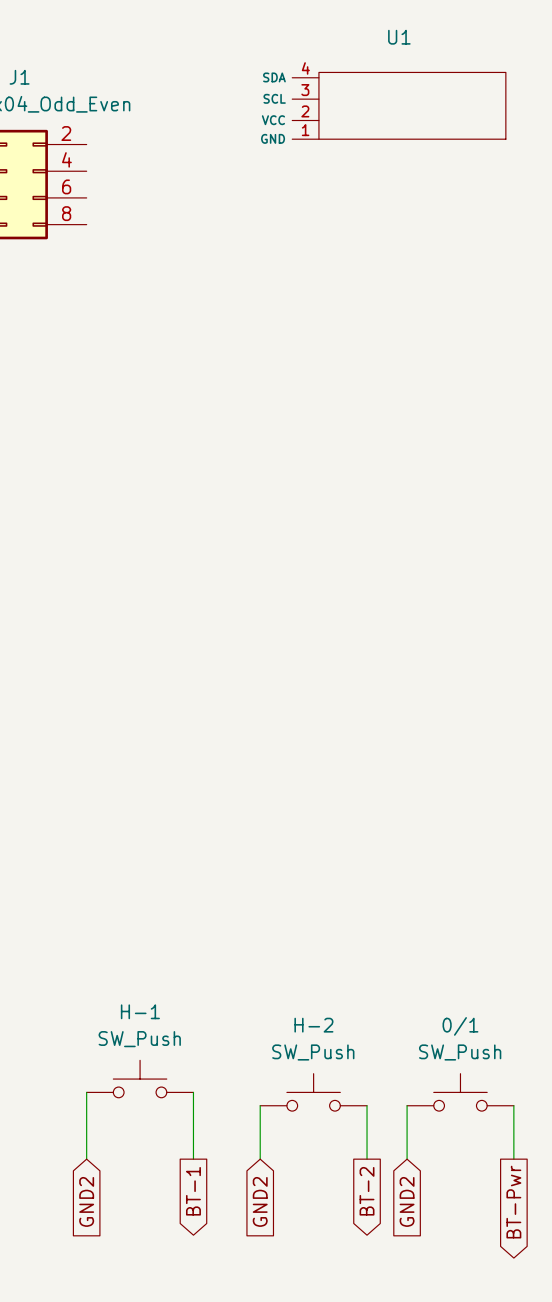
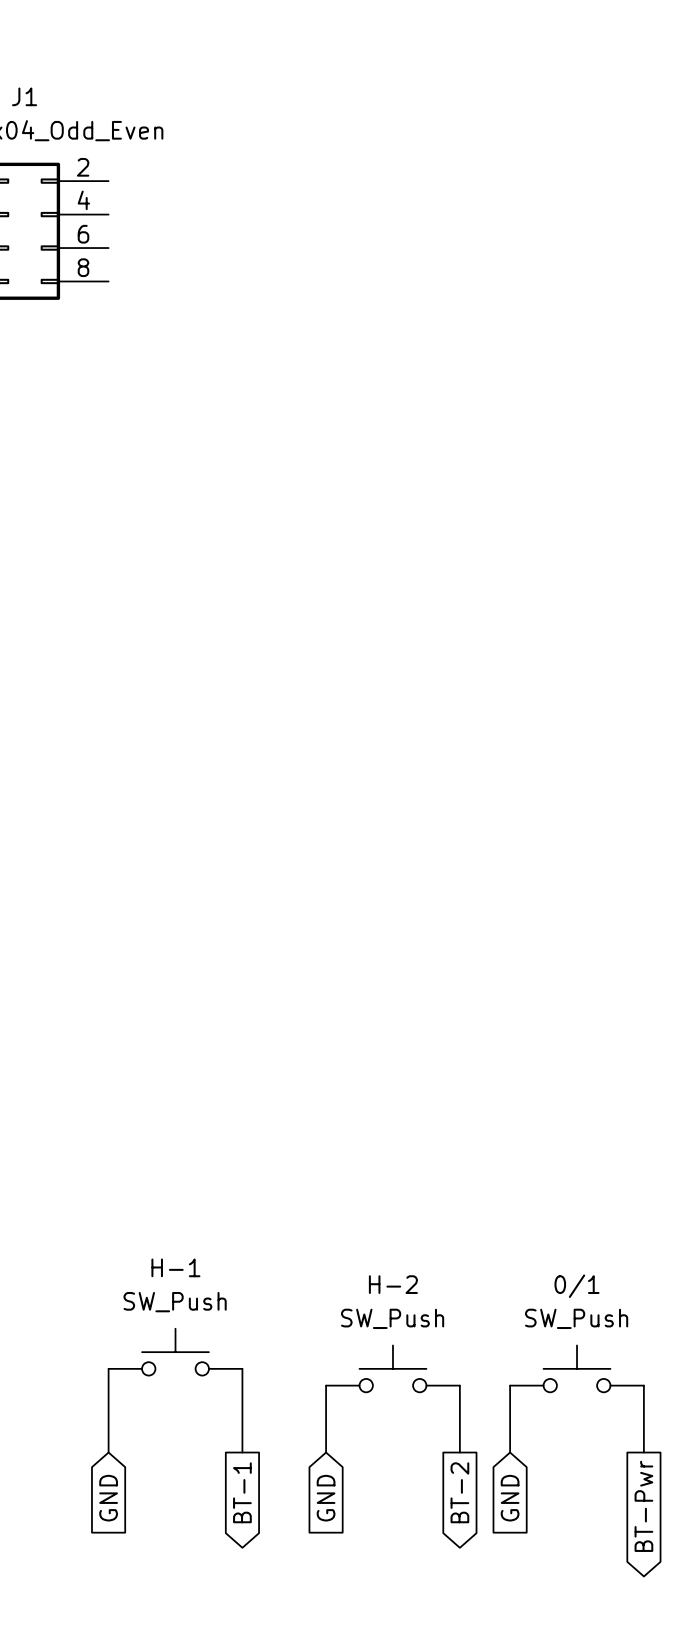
U1: (399, 105) -> none
global label: GND2 (86, 1201) -> GND (108, 1498)
global label: GND2 (260, 1201) -> GND (326, 1498)
global label: GND2 (407, 1201) -> GND (510, 1498)

